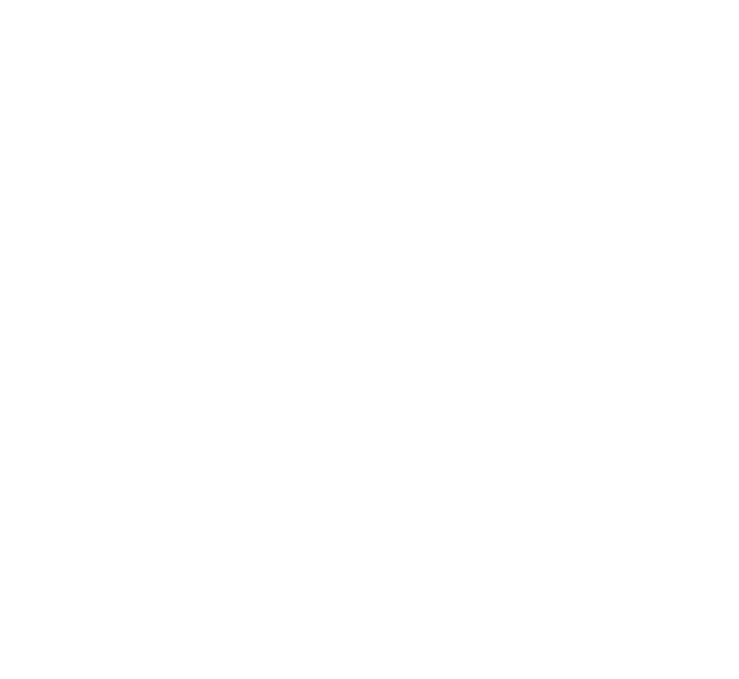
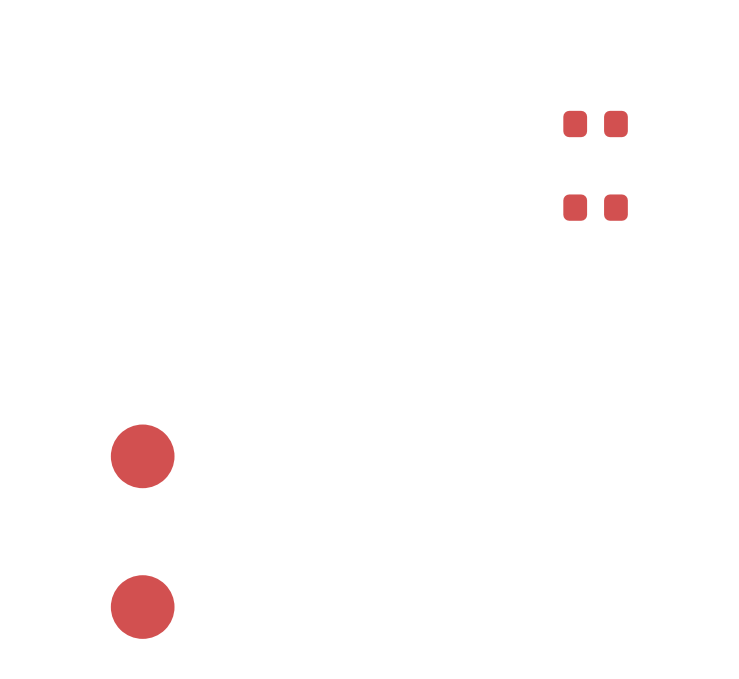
part: none -> (595, 124)
part: none -> (595, 207)
part: none -> (142, 456)
part: none -> (142, 607)

